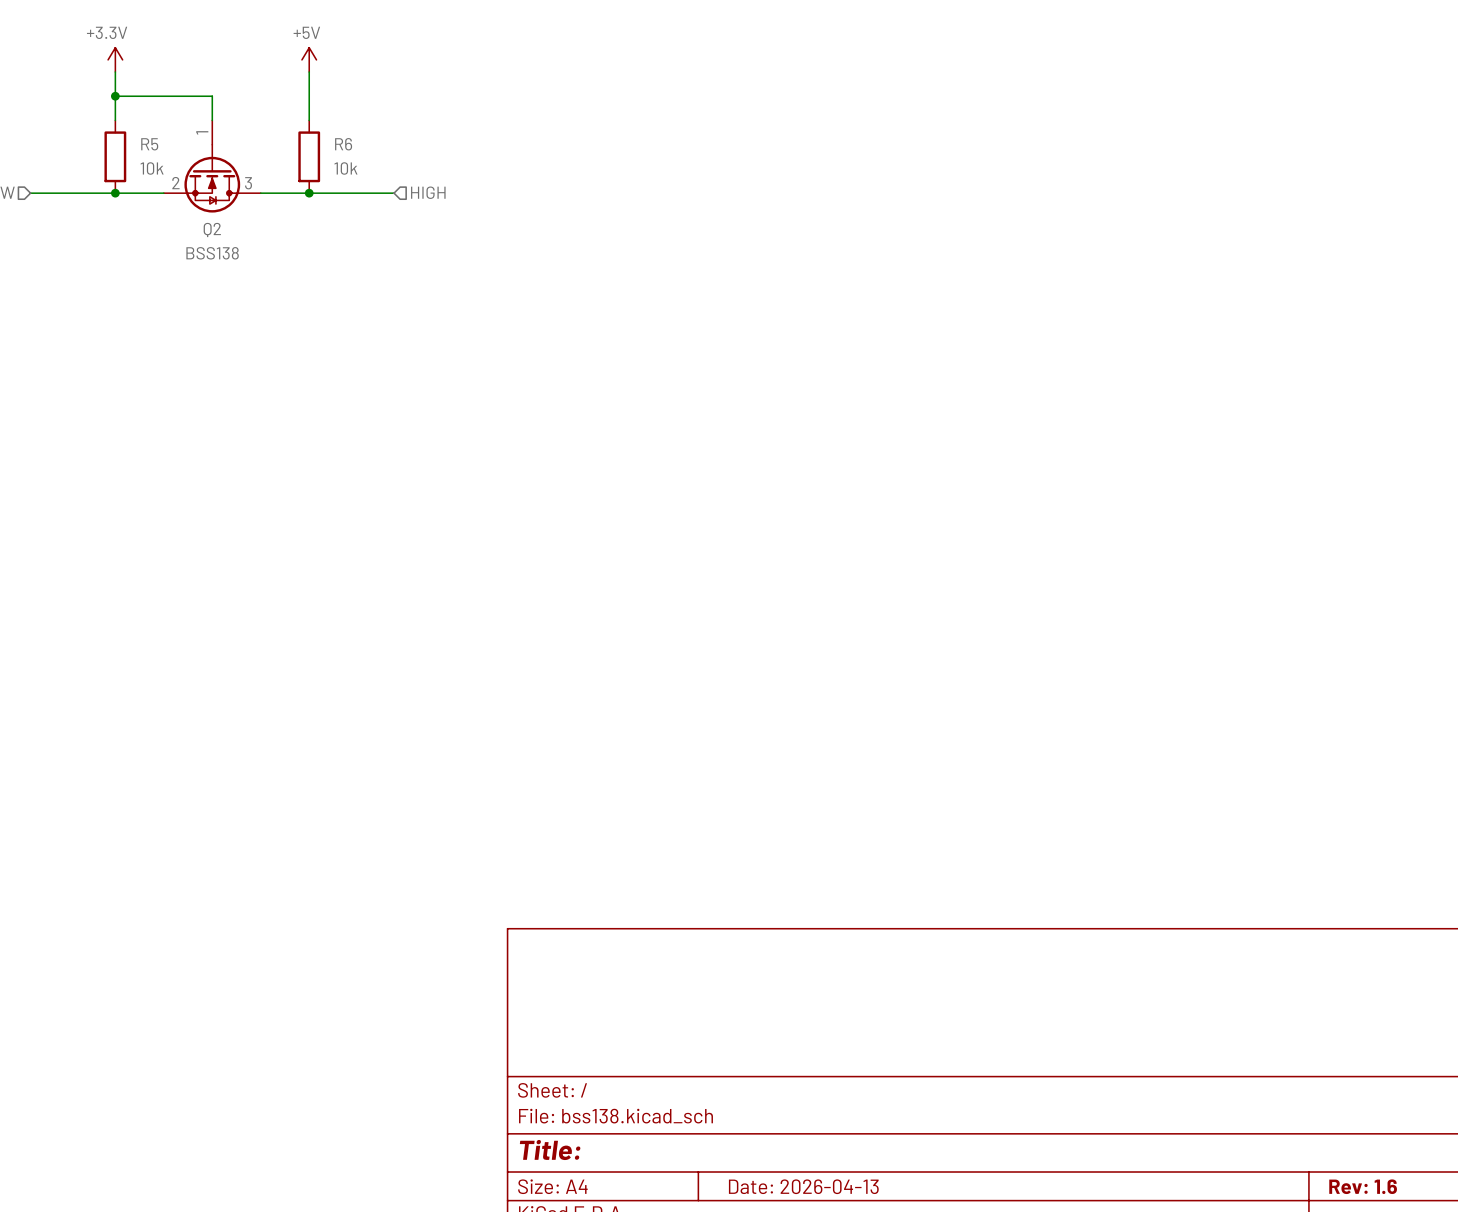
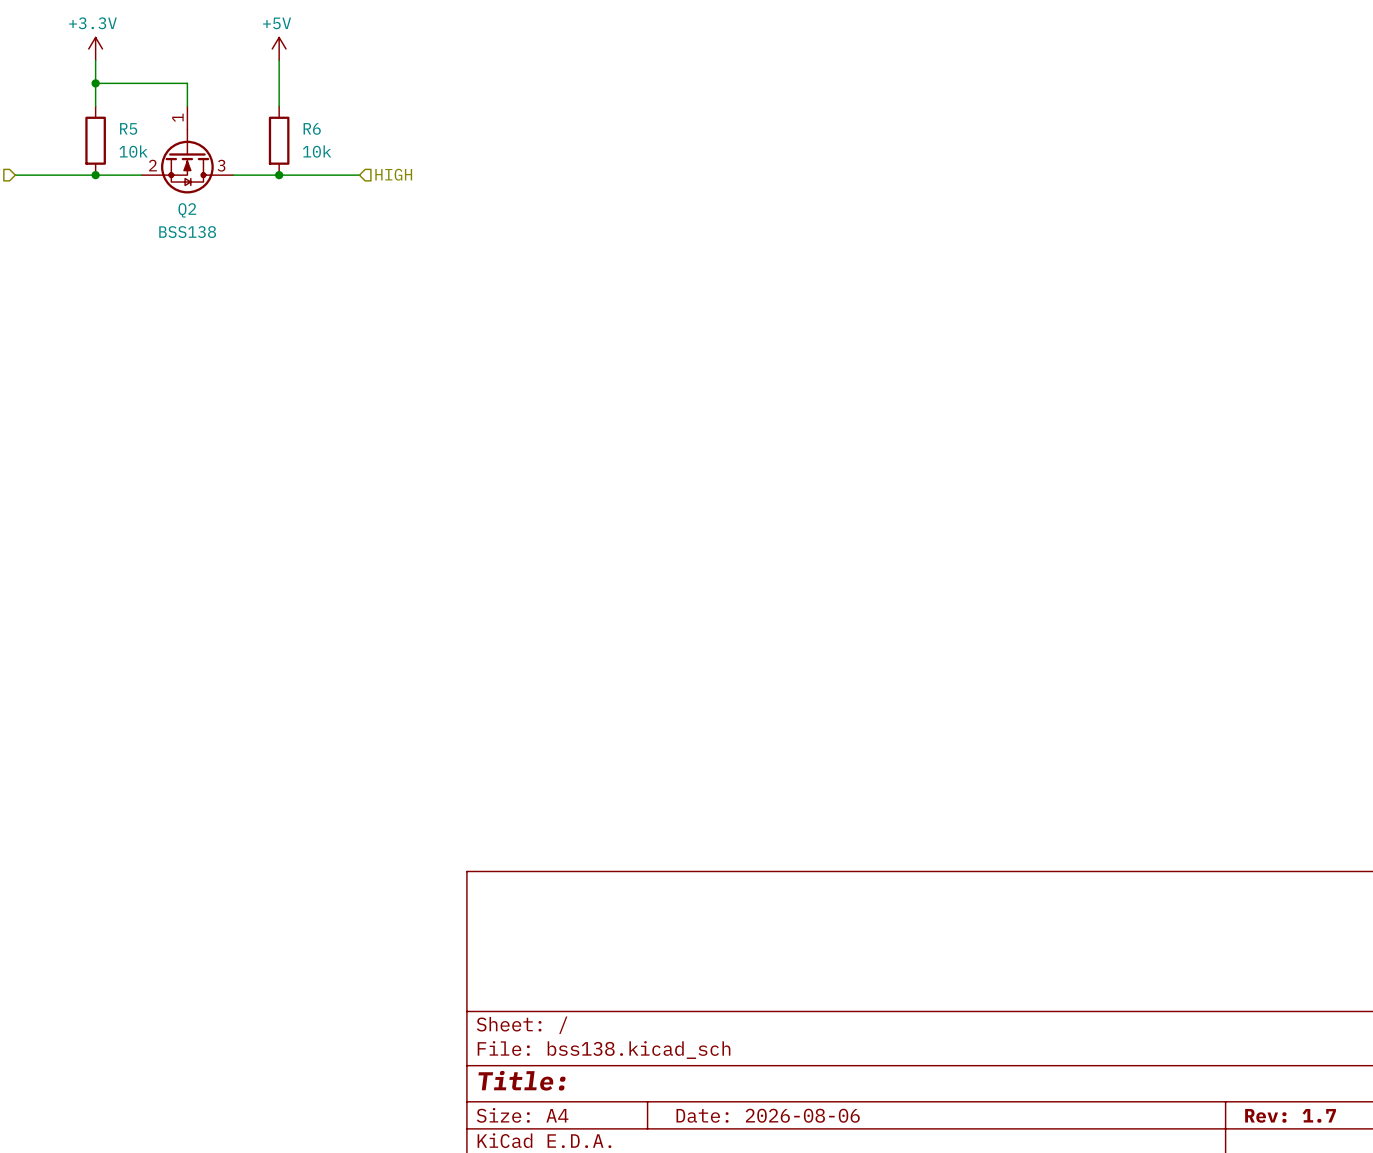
title block: Date: 2026-04-13 (803, 1186) -> Date: 2026-08-06 (768, 1115)
title block: Rev: 1.6 (1363, 1186) -> Rev: 1.7 (1290, 1115)

